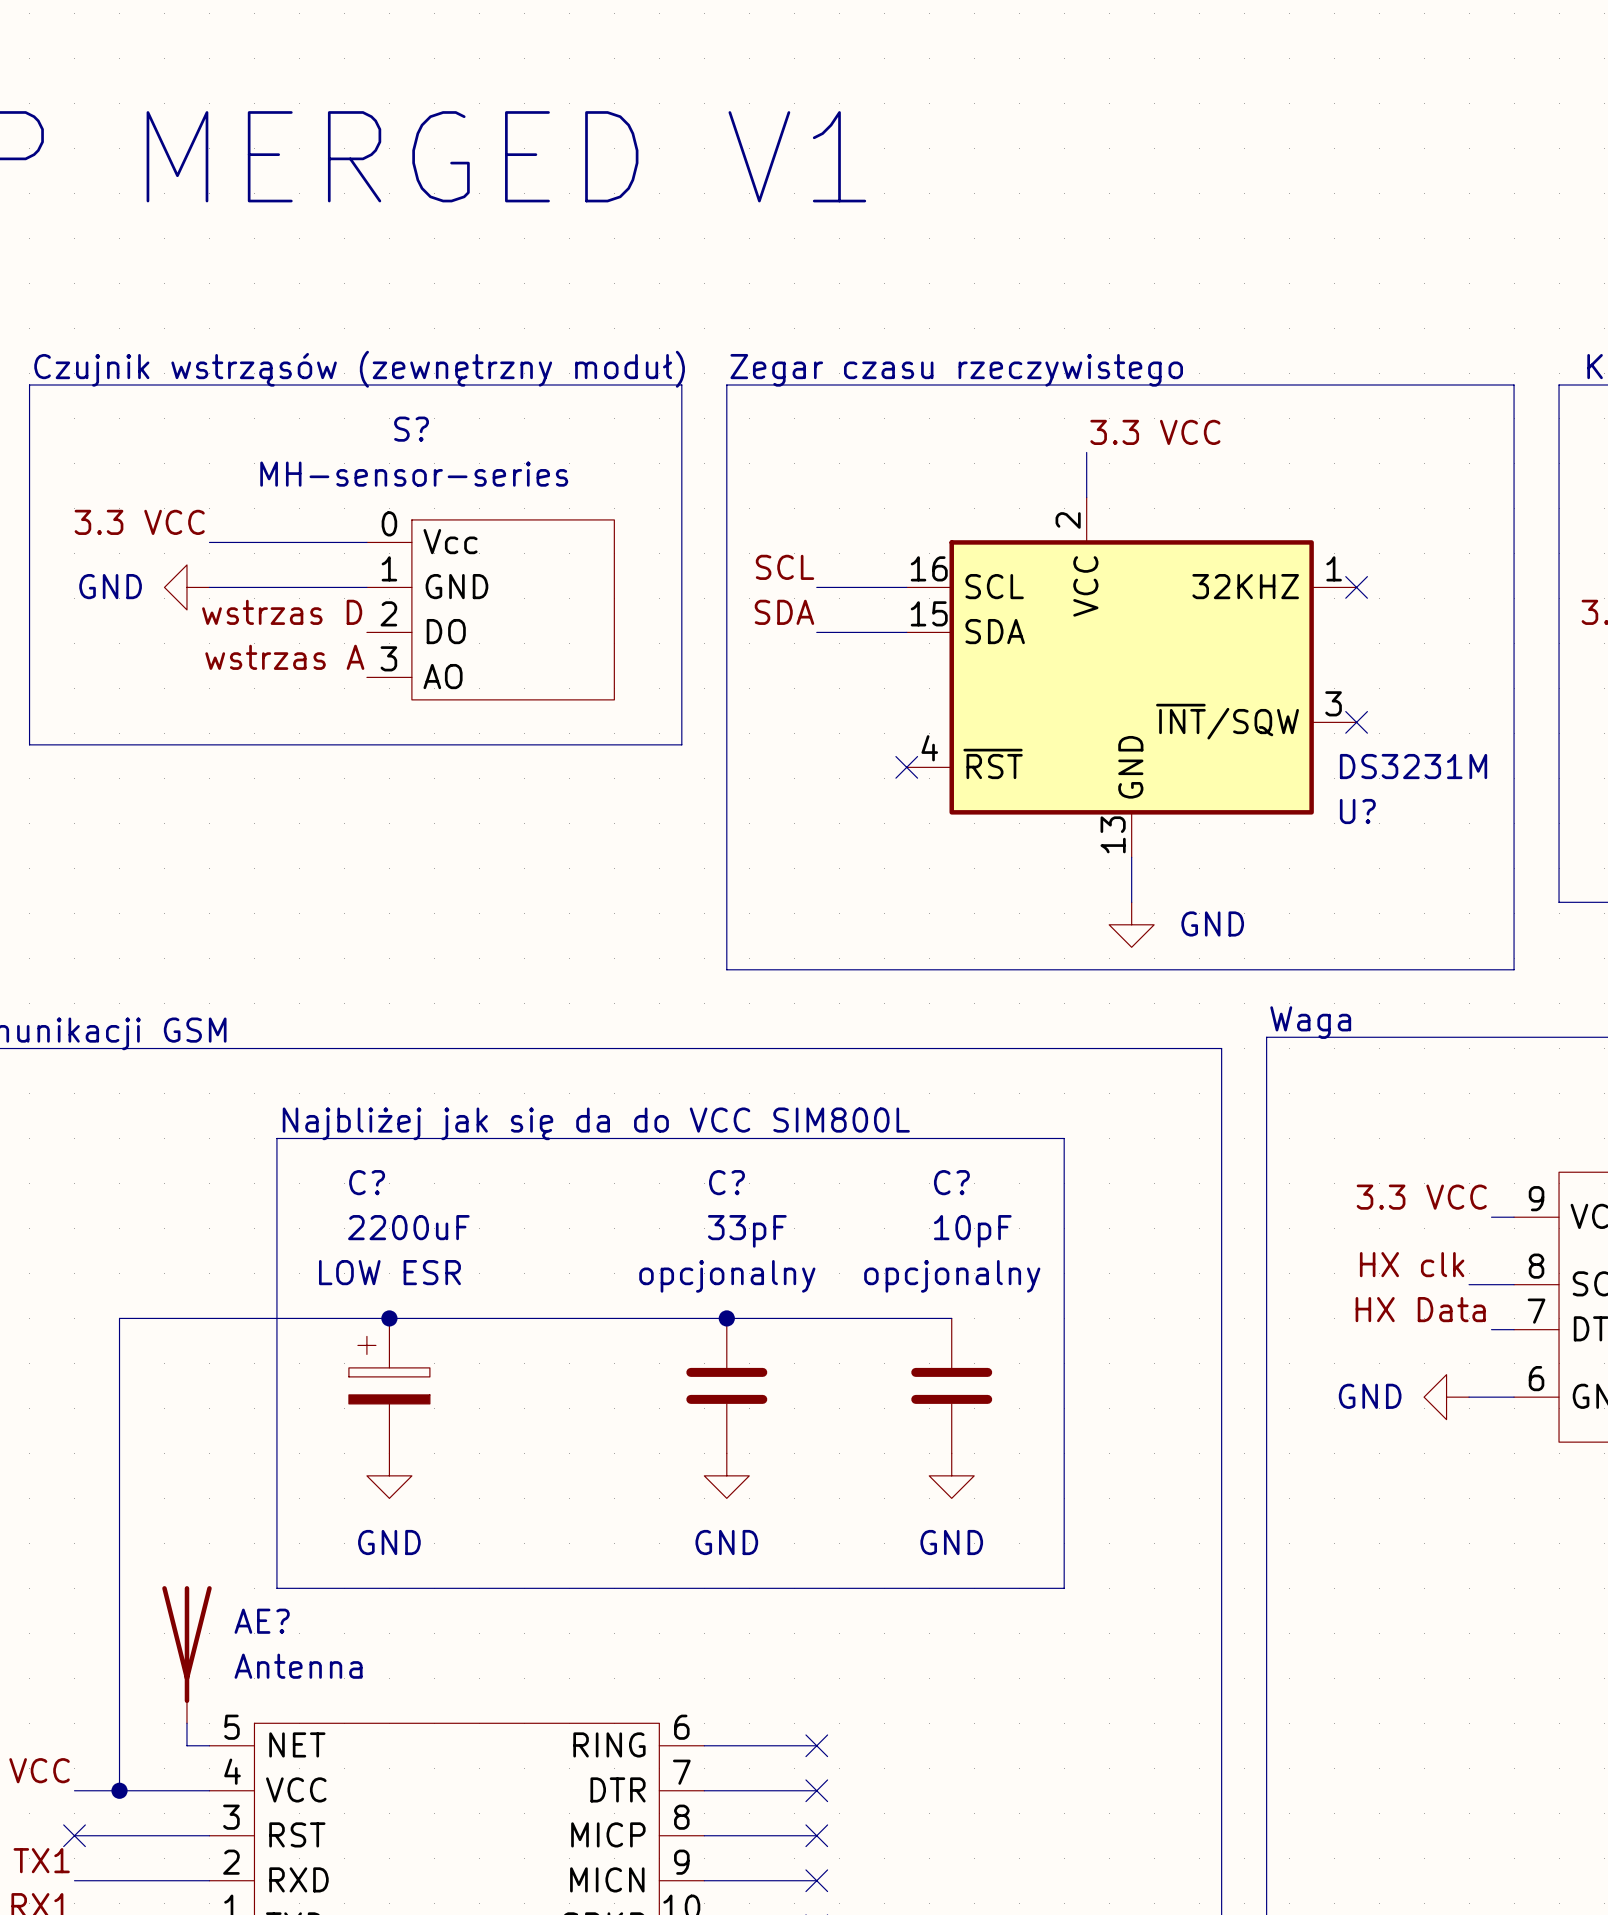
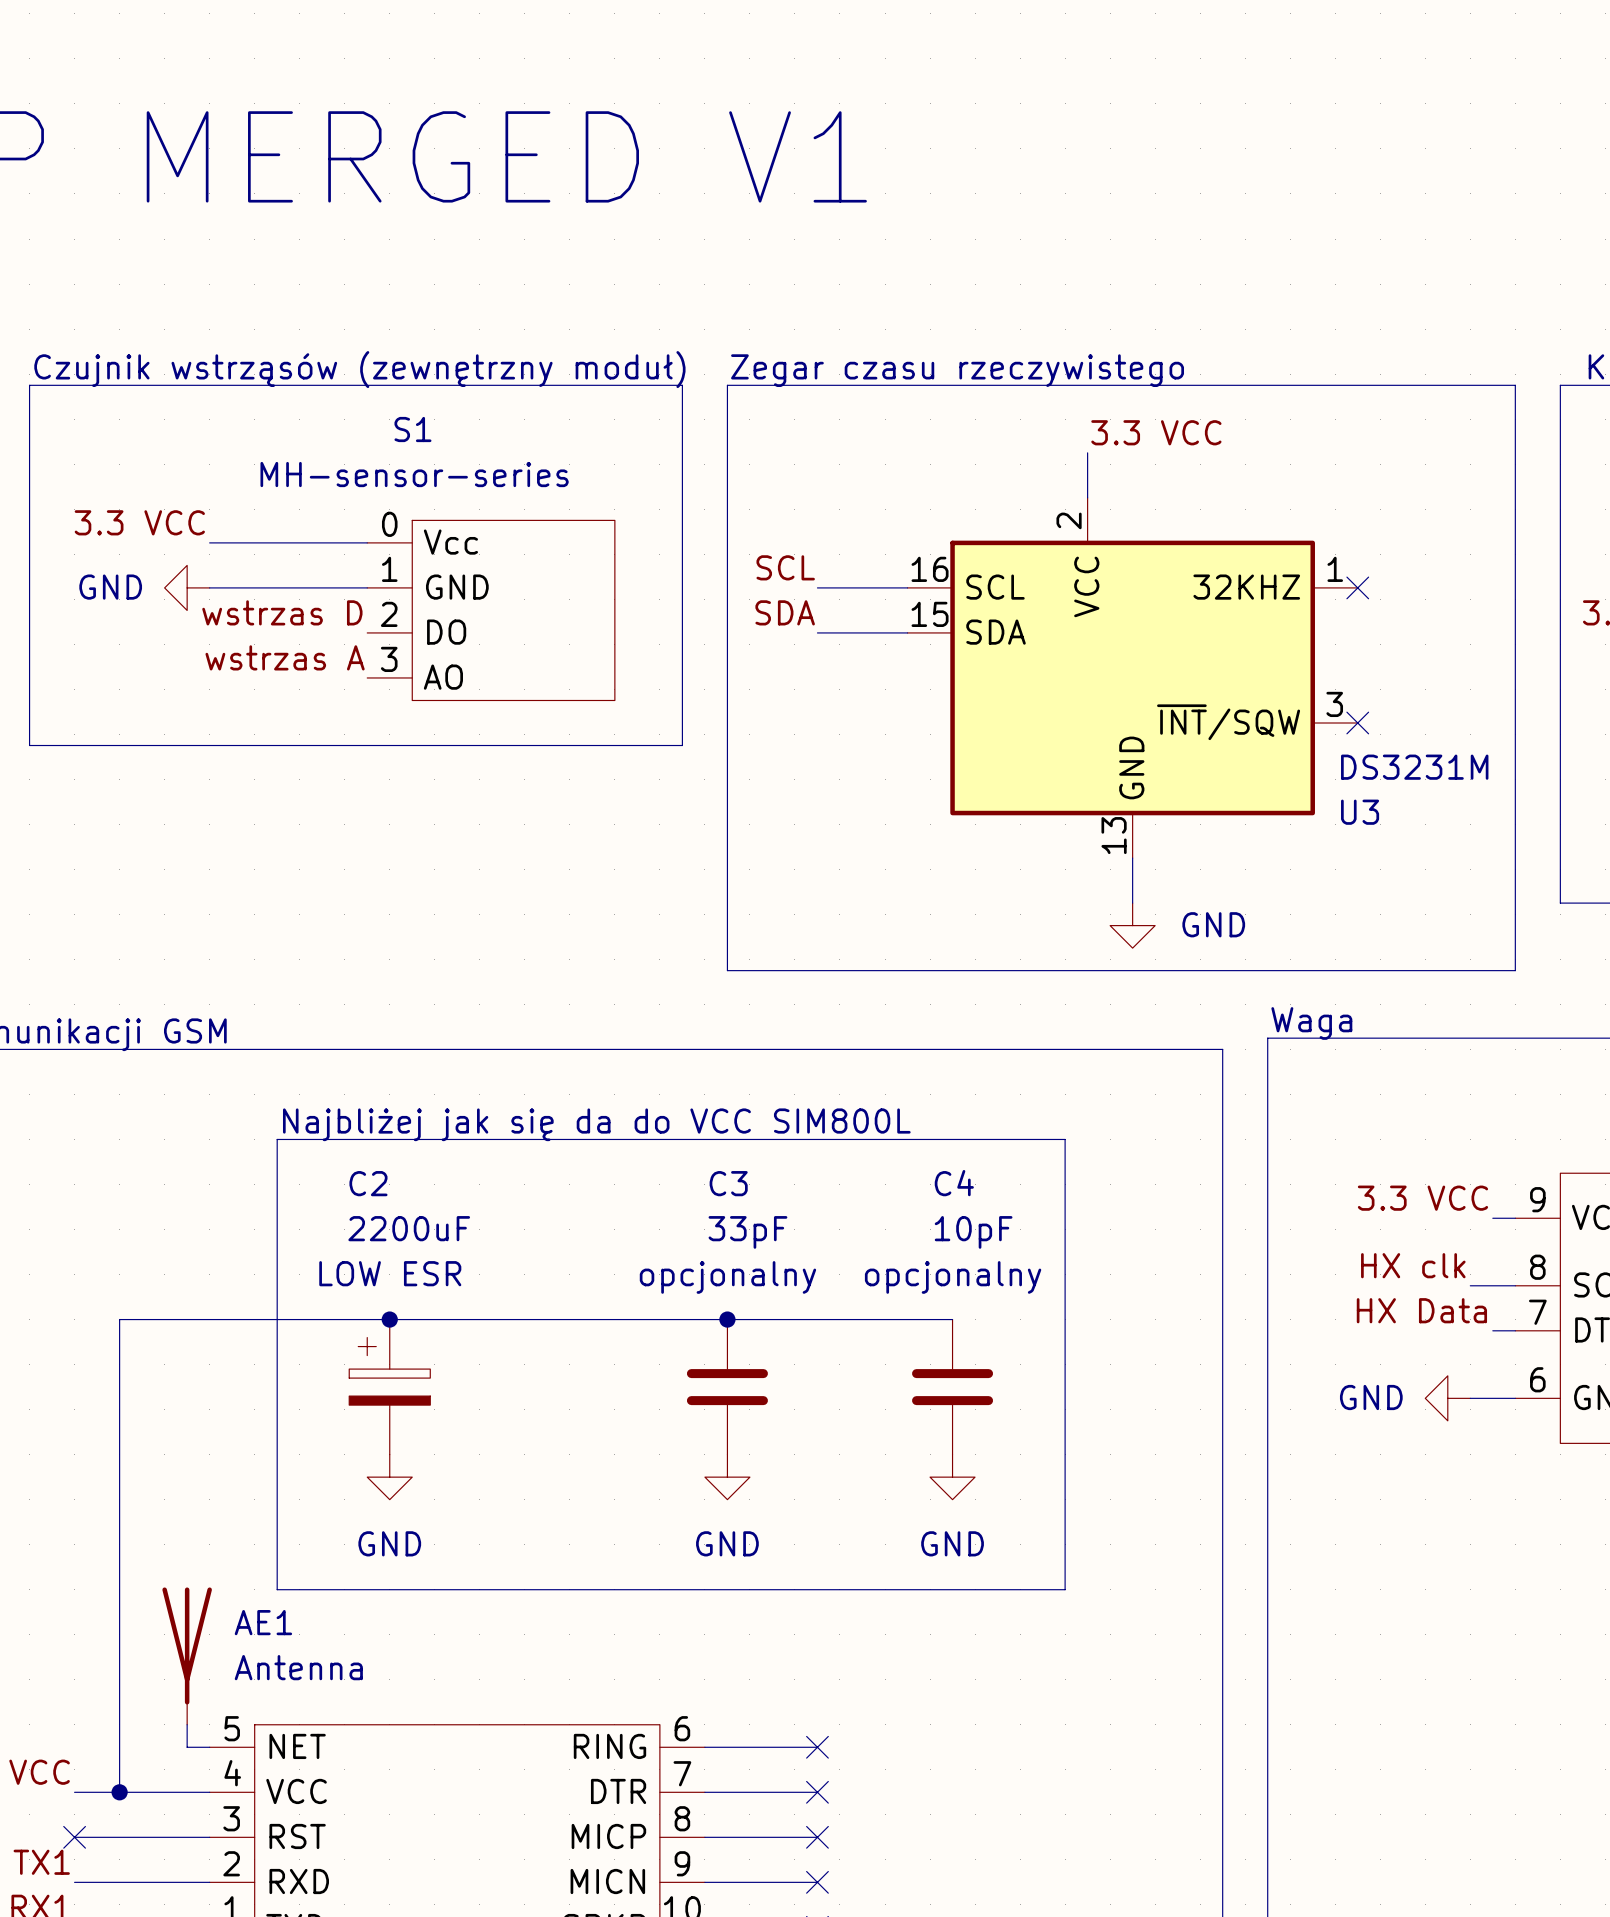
S? name: S? (411, 429) -> S1 (412, 429)
U?: DS3231M (1131, 677) -> none
U3: none -> DS3231M (1132, 677)
no-connect mark: (906, 767) -> none
C? name: C? (367, 1182) -> C2 (368, 1183)
C? name: C? (726, 1182) -> C3 (728, 1183)
C? name: C? (951, 1182) -> C4 (954, 1183)
AE? name: AE? (262, 1621) -> AE1 (263, 1622)

